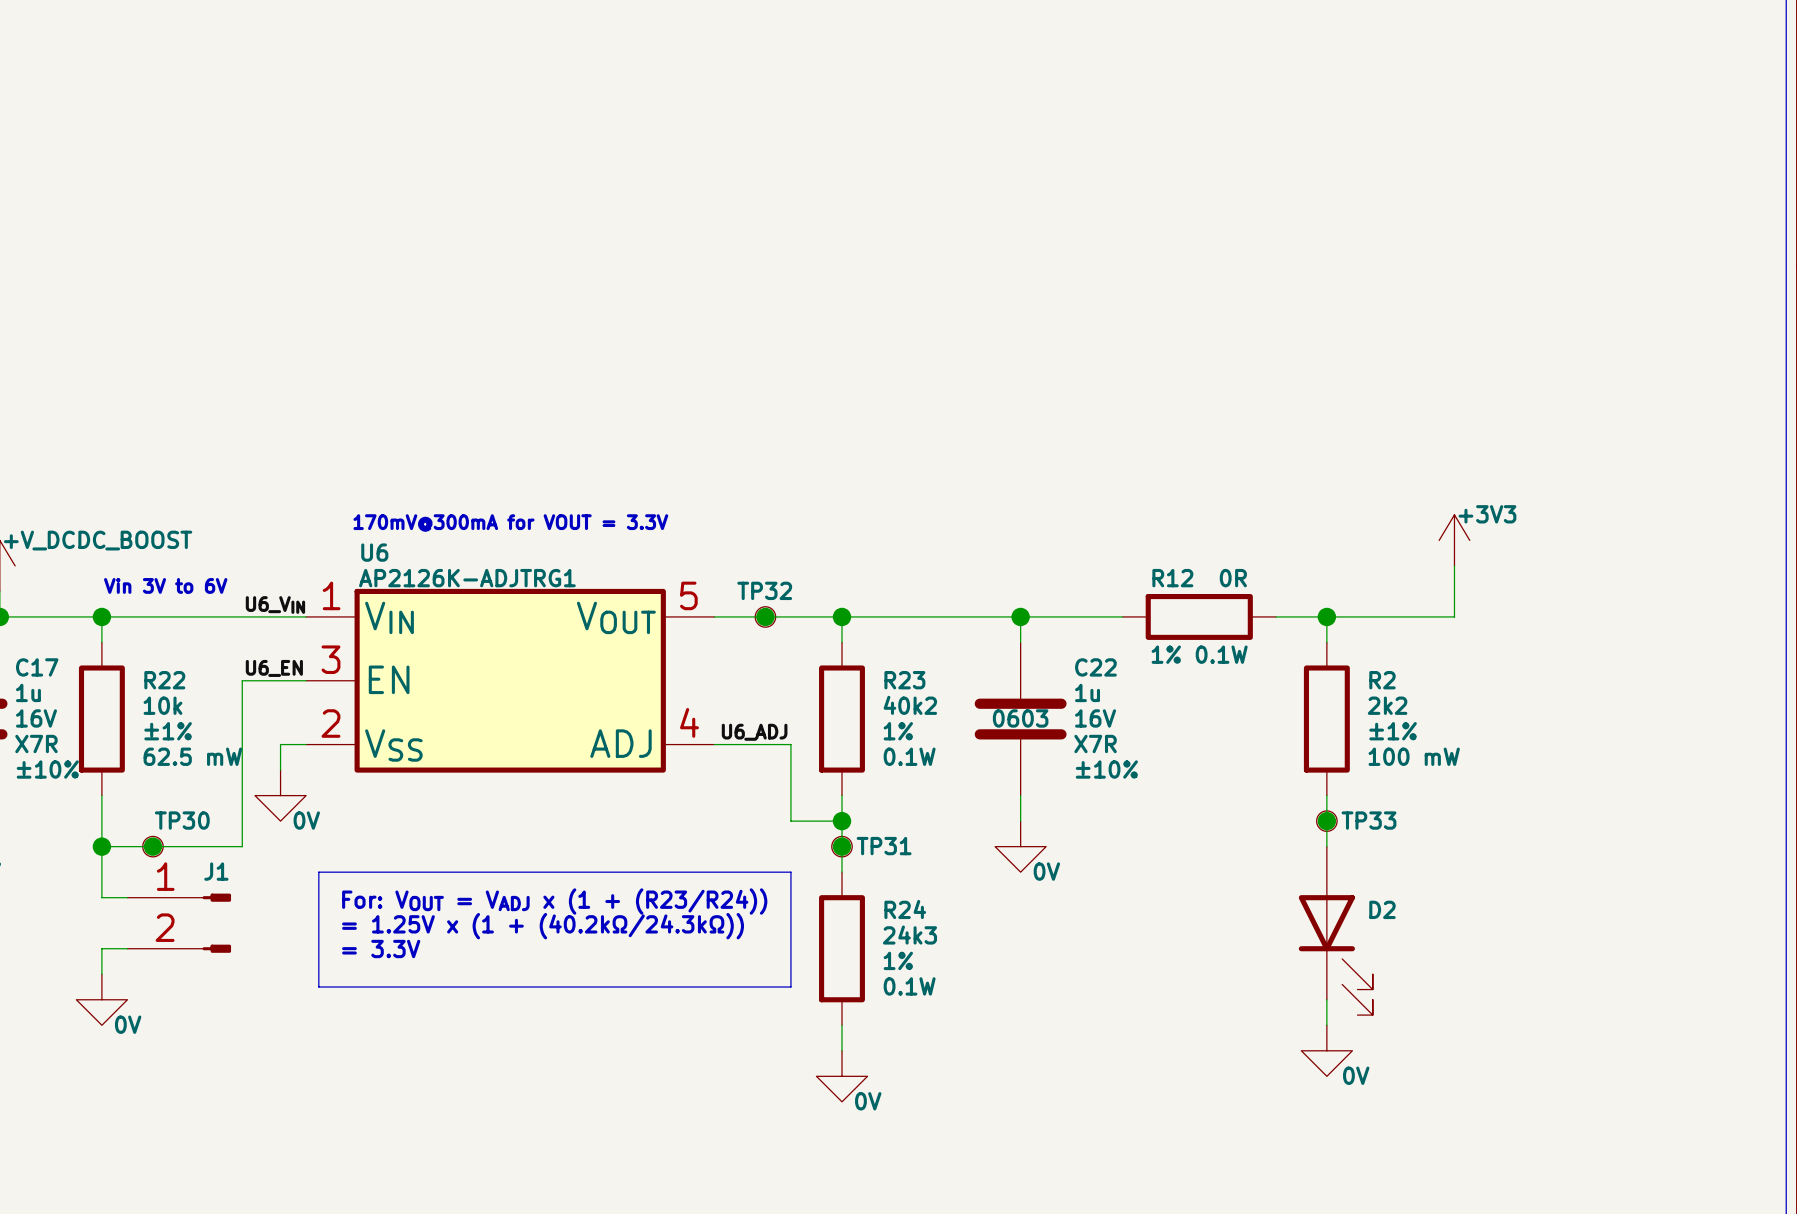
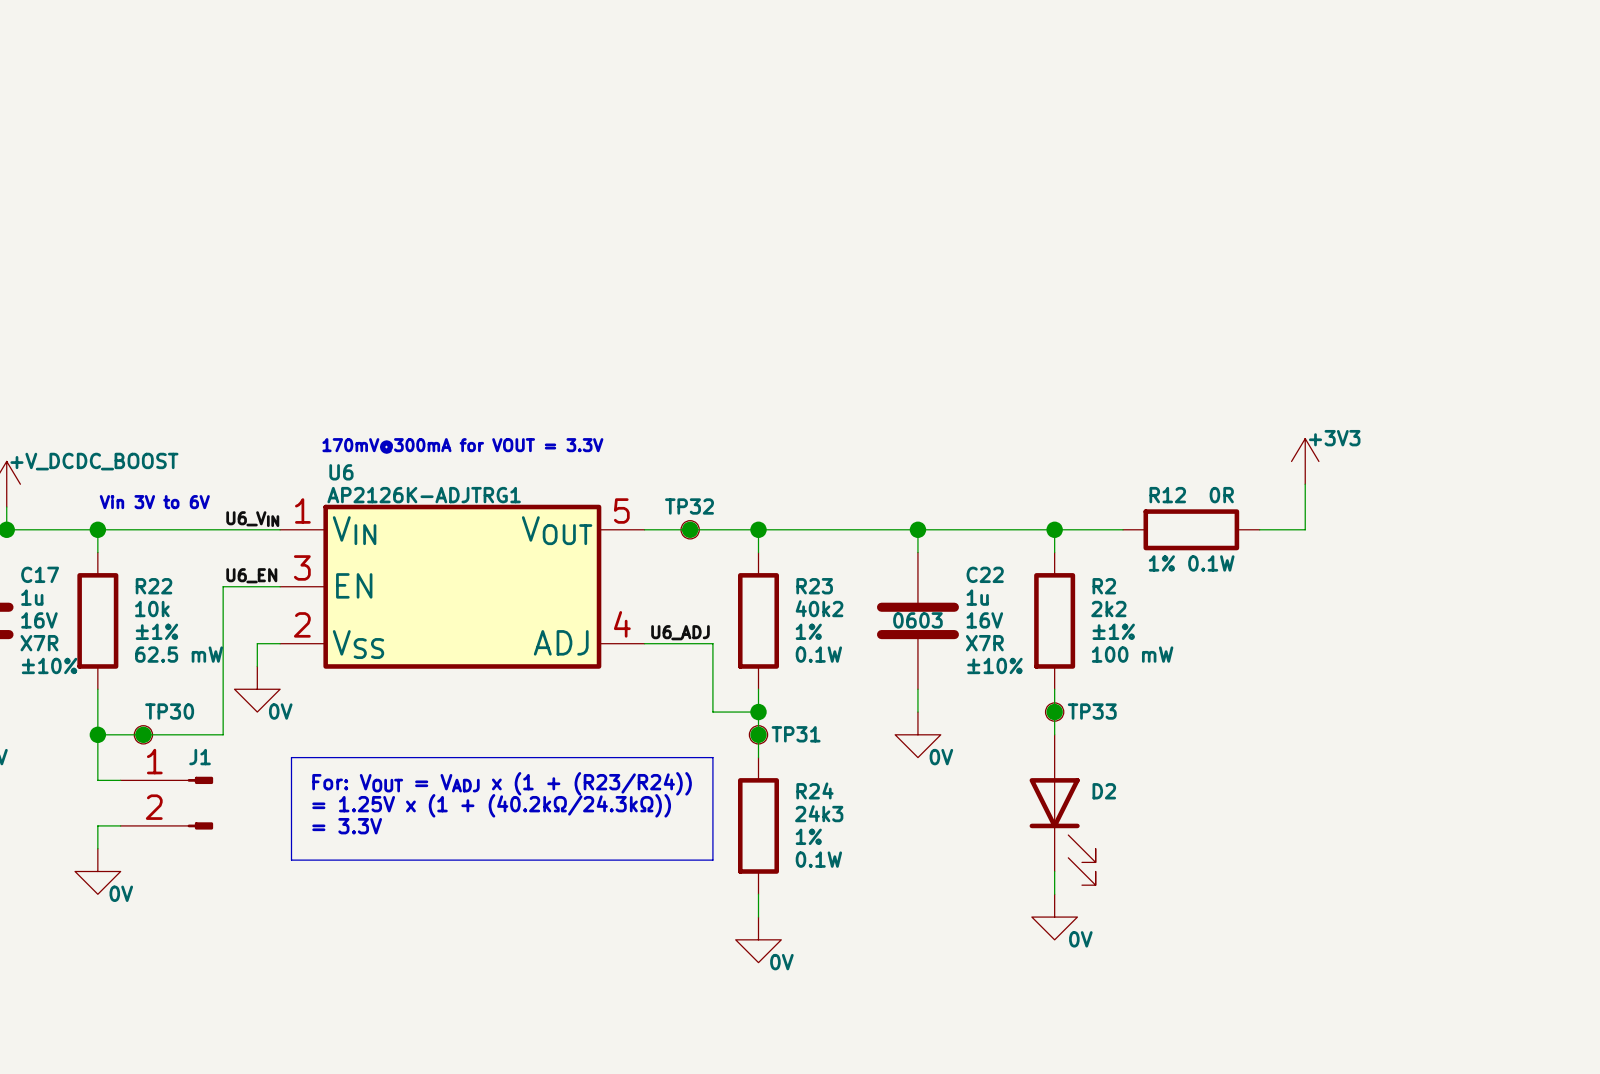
junction: none -> (1054, 529)
R12 position: (1199, 616) -> (1191, 529)
wire: (1275, 616) (1403, 616) -> (1009, 529) (1122, 529)
wire: (1326, 616) (1326, 642) -> (1054, 529) (1054, 552)
junction: (1326, 616) -> none
R2 position: (1326, 719) -> (1054, 620)
wire: (1326, 795) (1326, 846) -> (1054, 689) (1054, 734)
junction: none -> (1054, 712)
junction: (1326, 821) -> none
TP33 position: (1326, 821) -> (1054, 712)
D2 position: (1335, 930) -> (1062, 809)
wire: (1326, 999) (1326, 1025) -> (1054, 871) (1054, 894)
power symbol position: 0V (1326, 1050) -> 0V (1054, 917)

